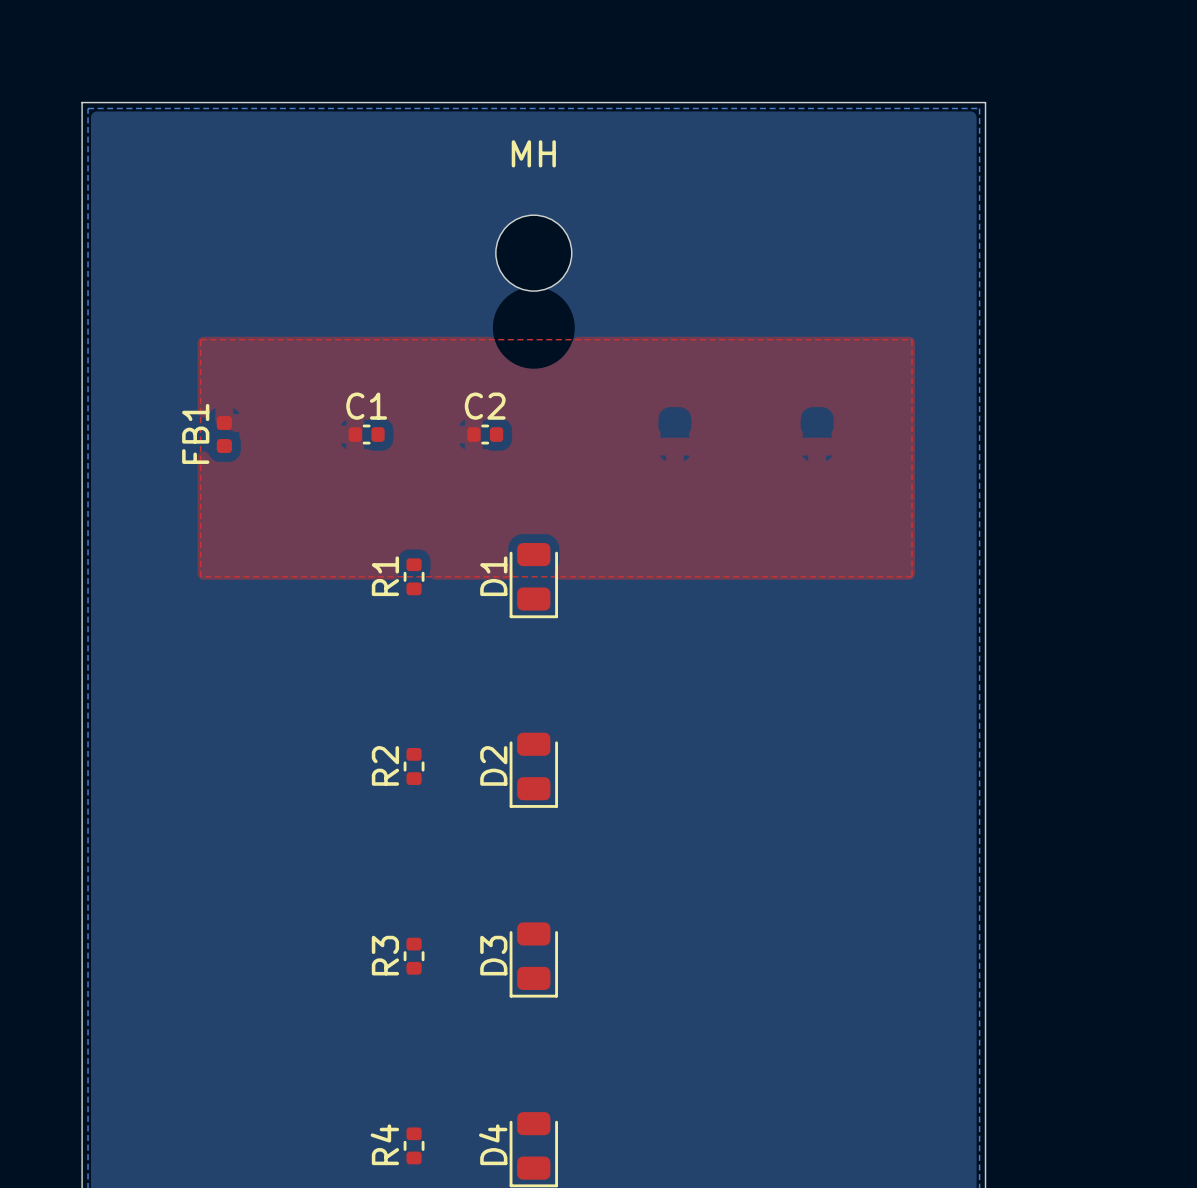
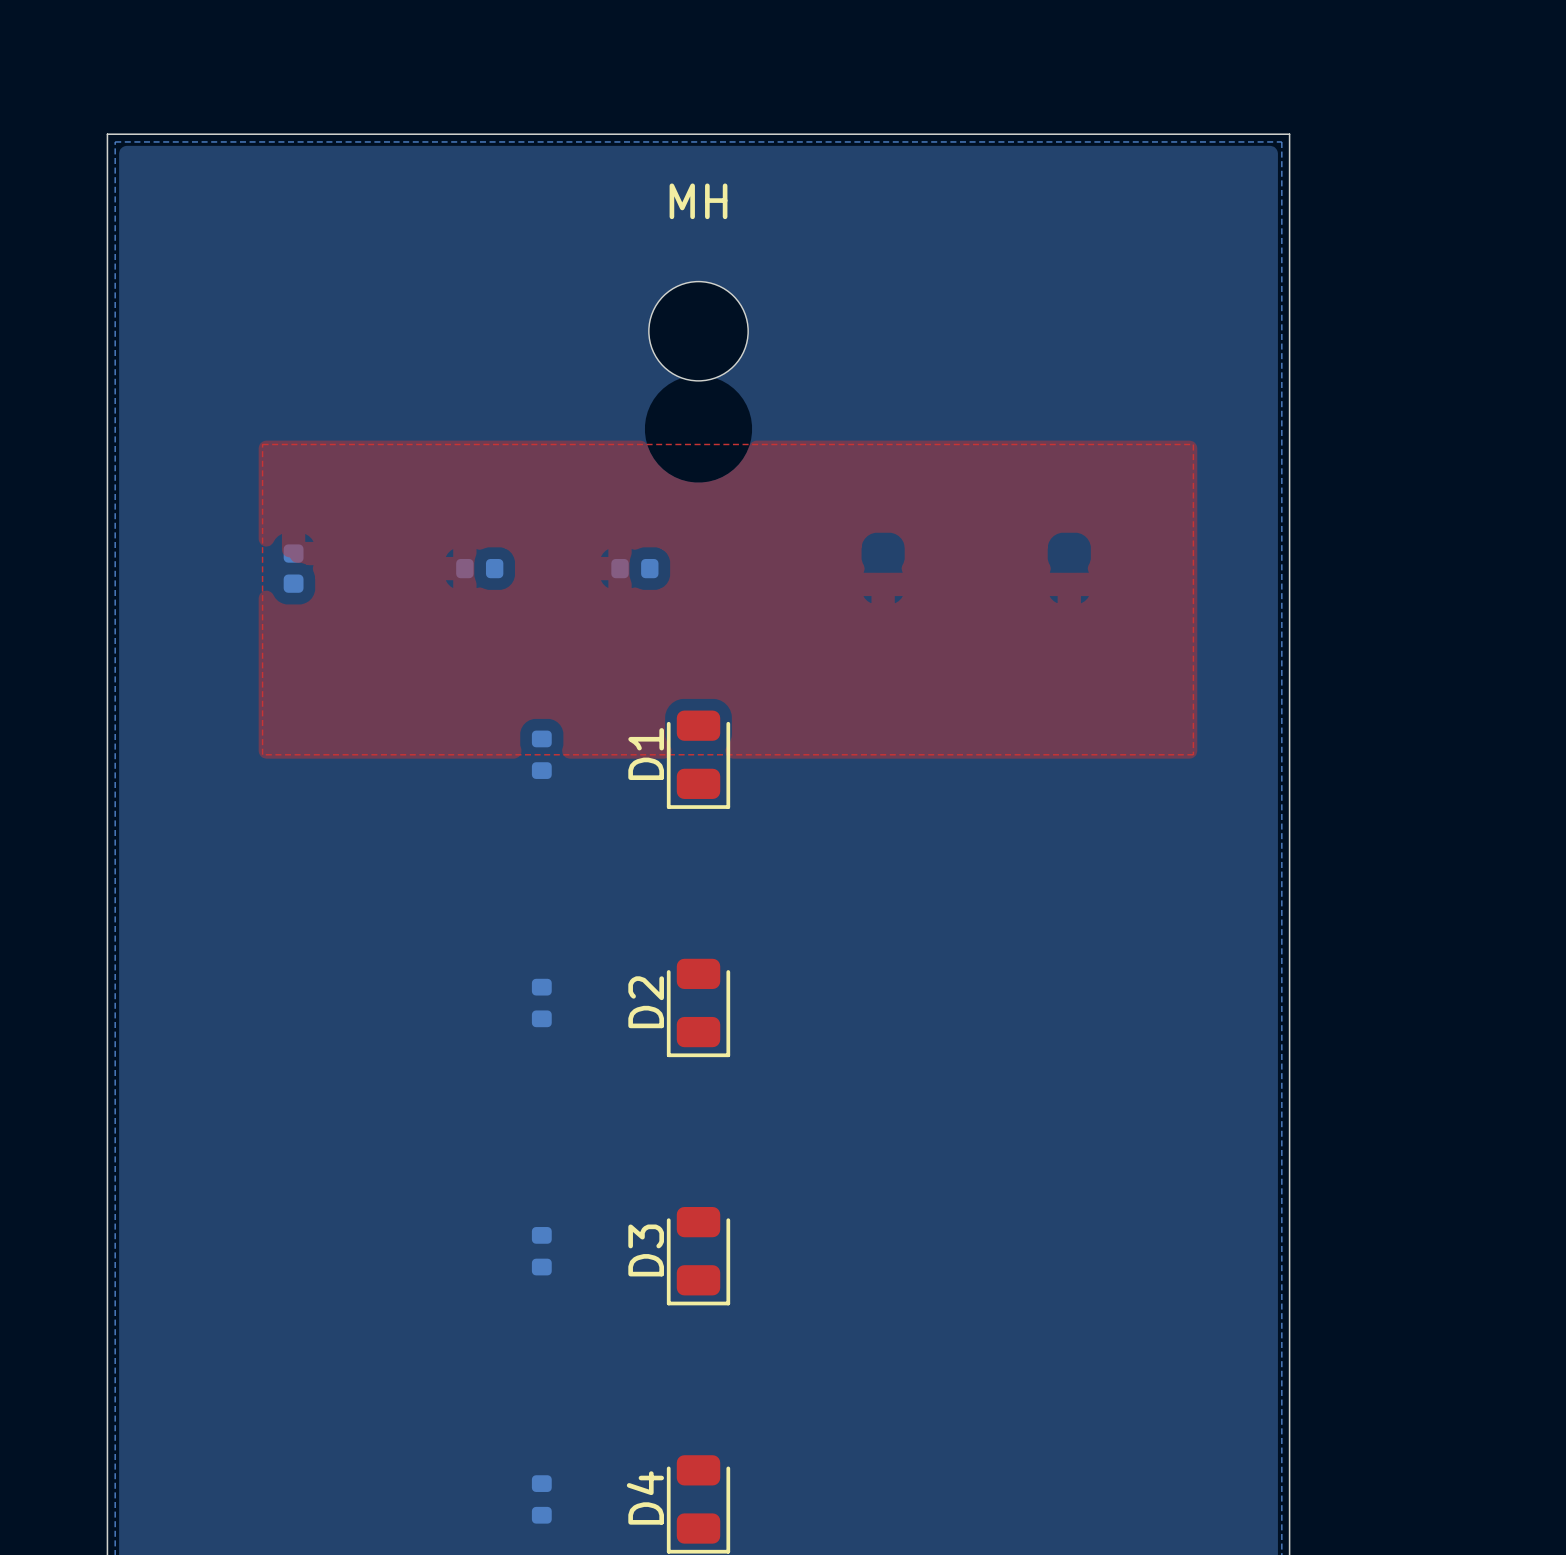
FB1 side: top (224, 434) -> bottom (293, 568)
C1 side: top (366, 434) -> bottom (479, 568)
C2 side: top (485, 434) -> bottom (634, 568)
R1 side: top (414, 576) -> bottom (541, 754)
R2 side: top (414, 766) -> bottom (541, 1002)
R3 side: top (414, 956) -> bottom (541, 1251)
R4 side: top (414, 1145) -> bottom (541, 1499)

